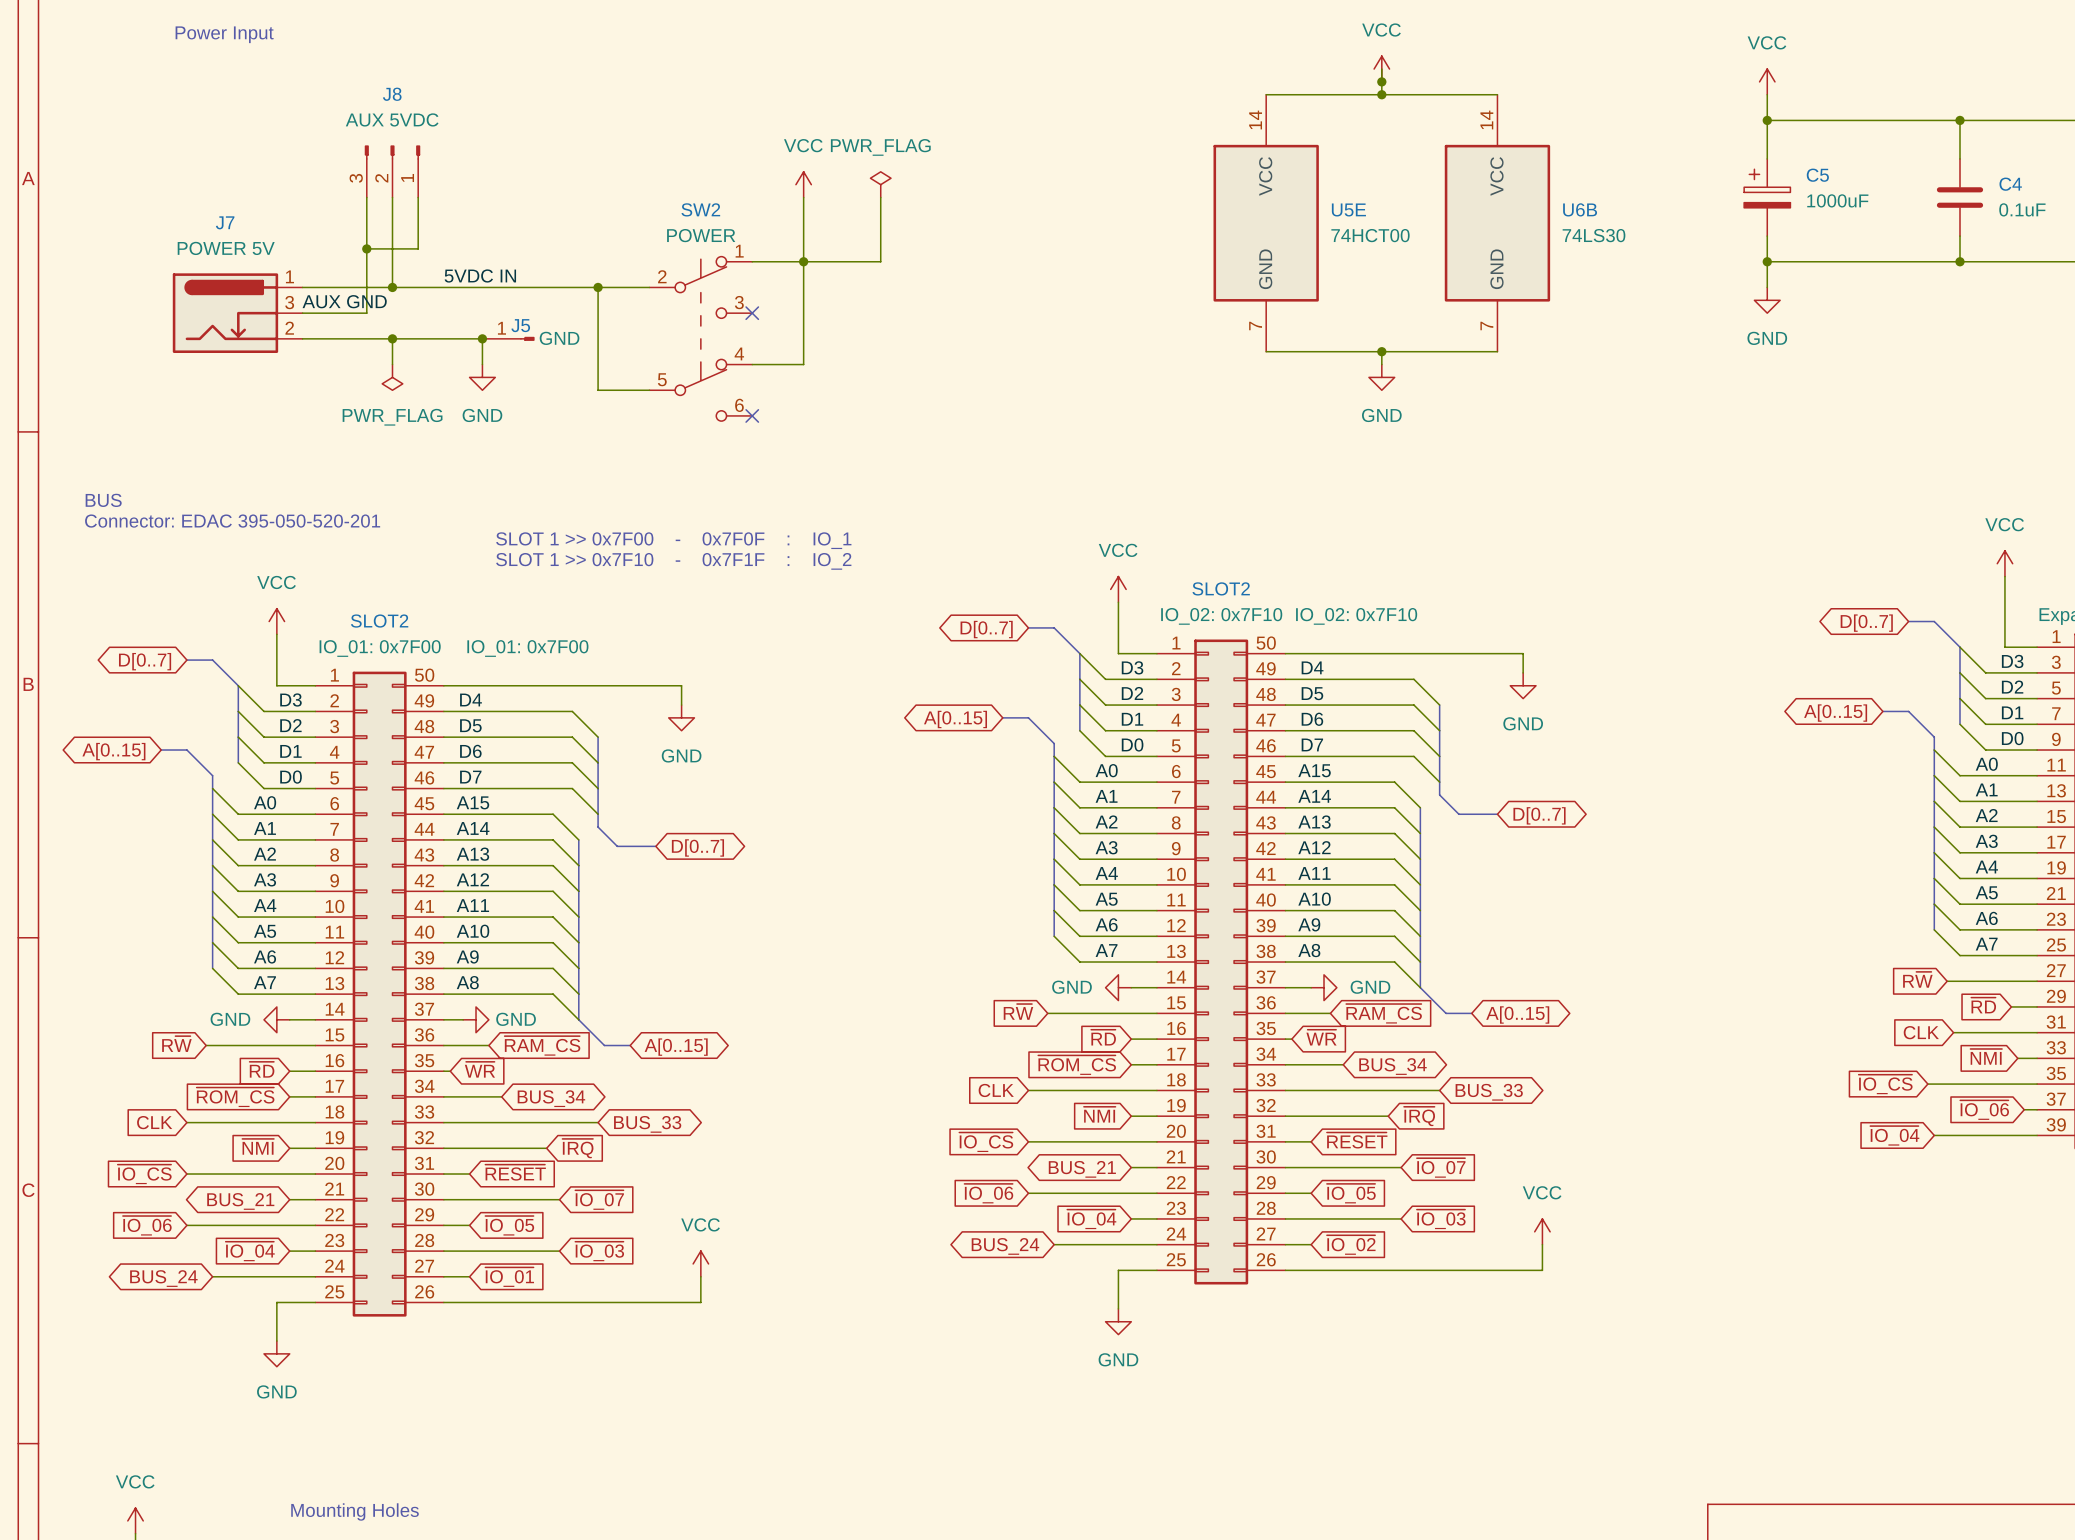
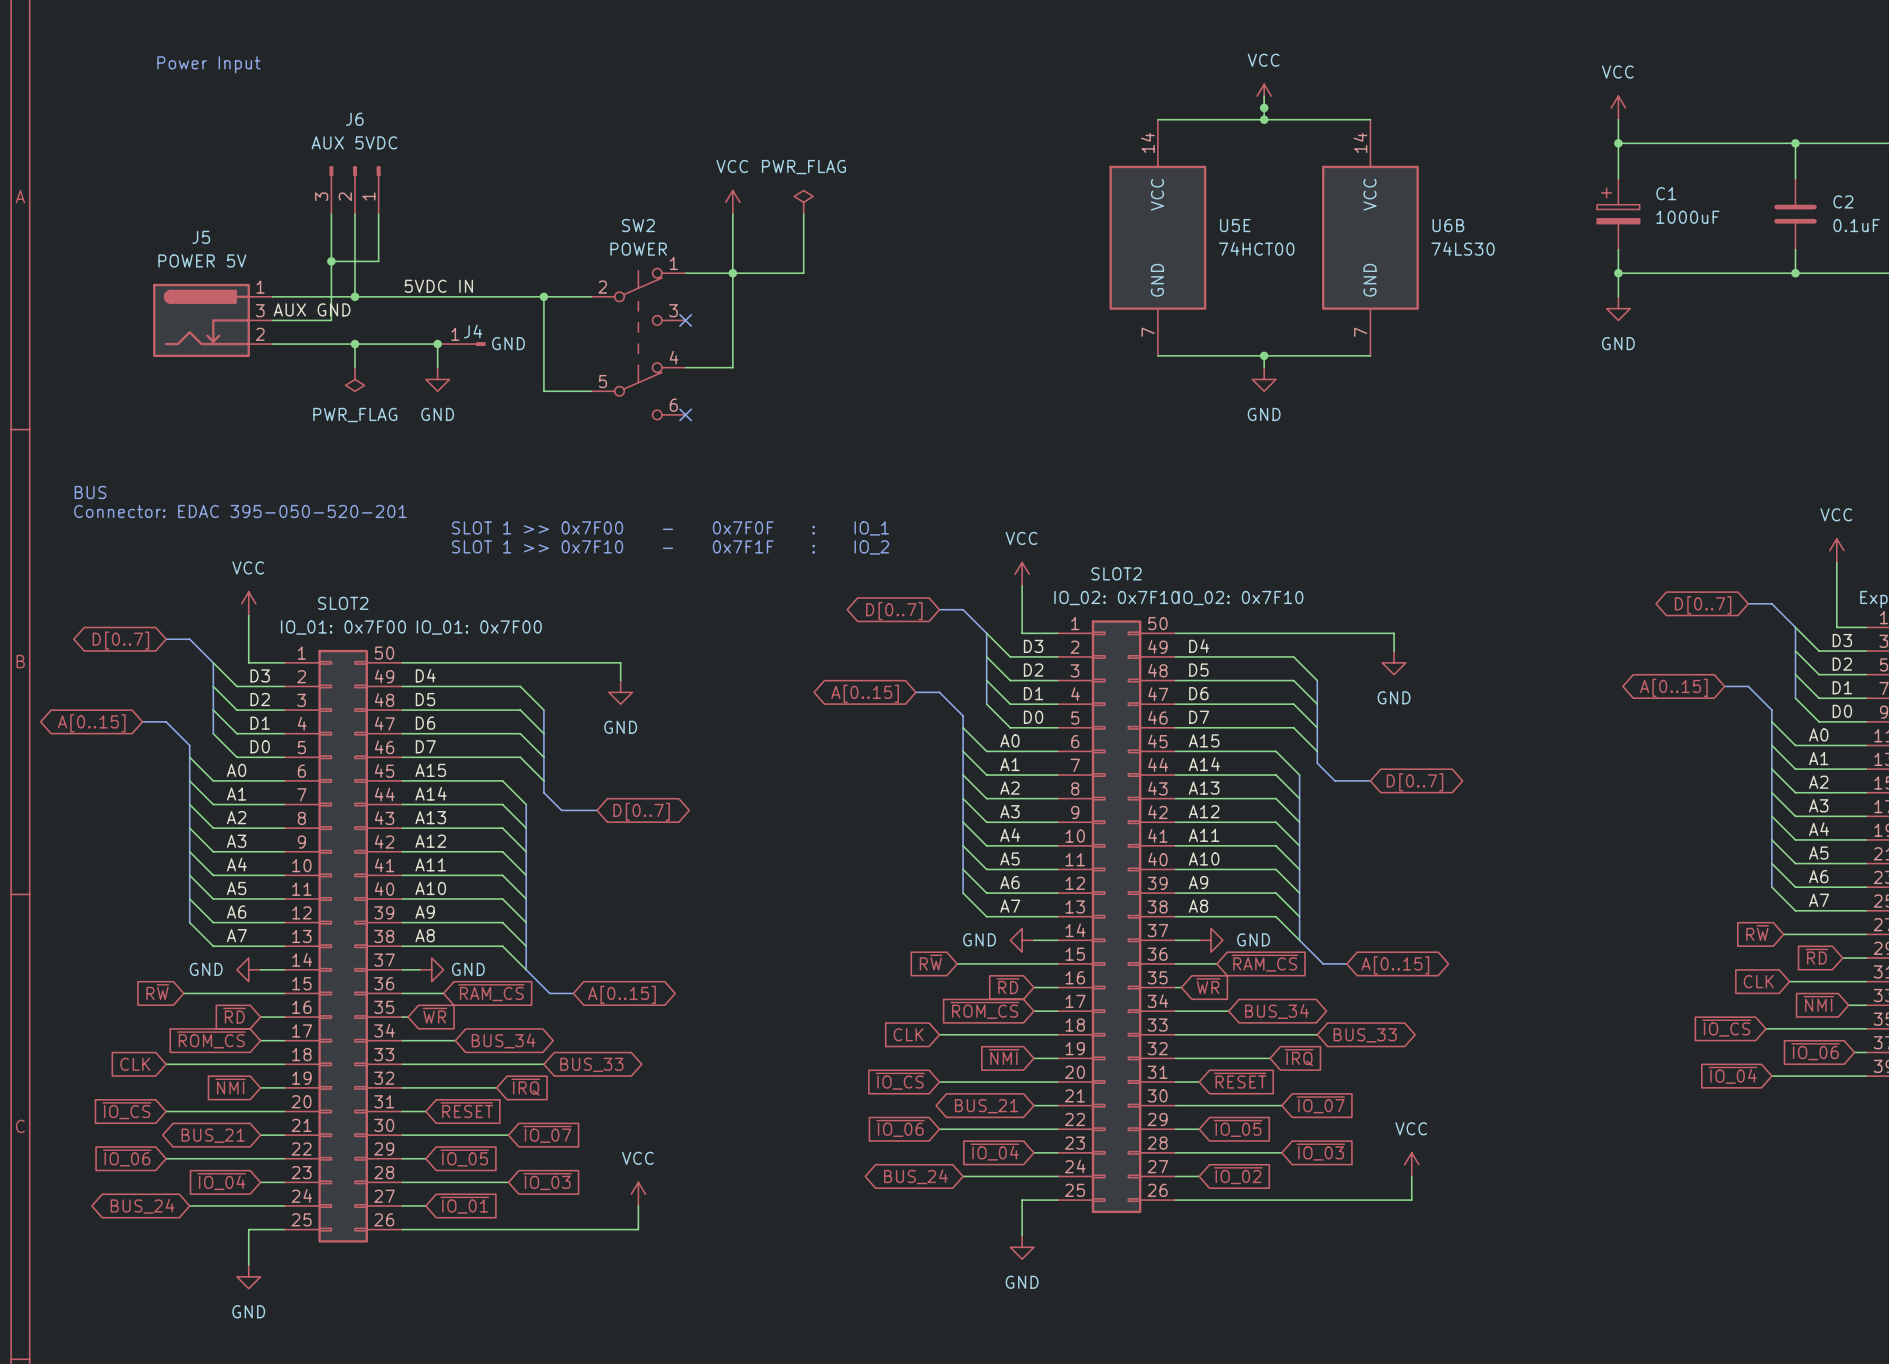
J8 name: J8 (392, 94) -> J6 (354, 119)
C5 name: C5 (1817, 175) -> C1 (1666, 193)
C4 name: C4 (2010, 184) -> C2 (1843, 201)
J7 name: J7 (225, 222) -> J5 (201, 237)
J5 name: J5 (520, 325) -> J4 (473, 331)

